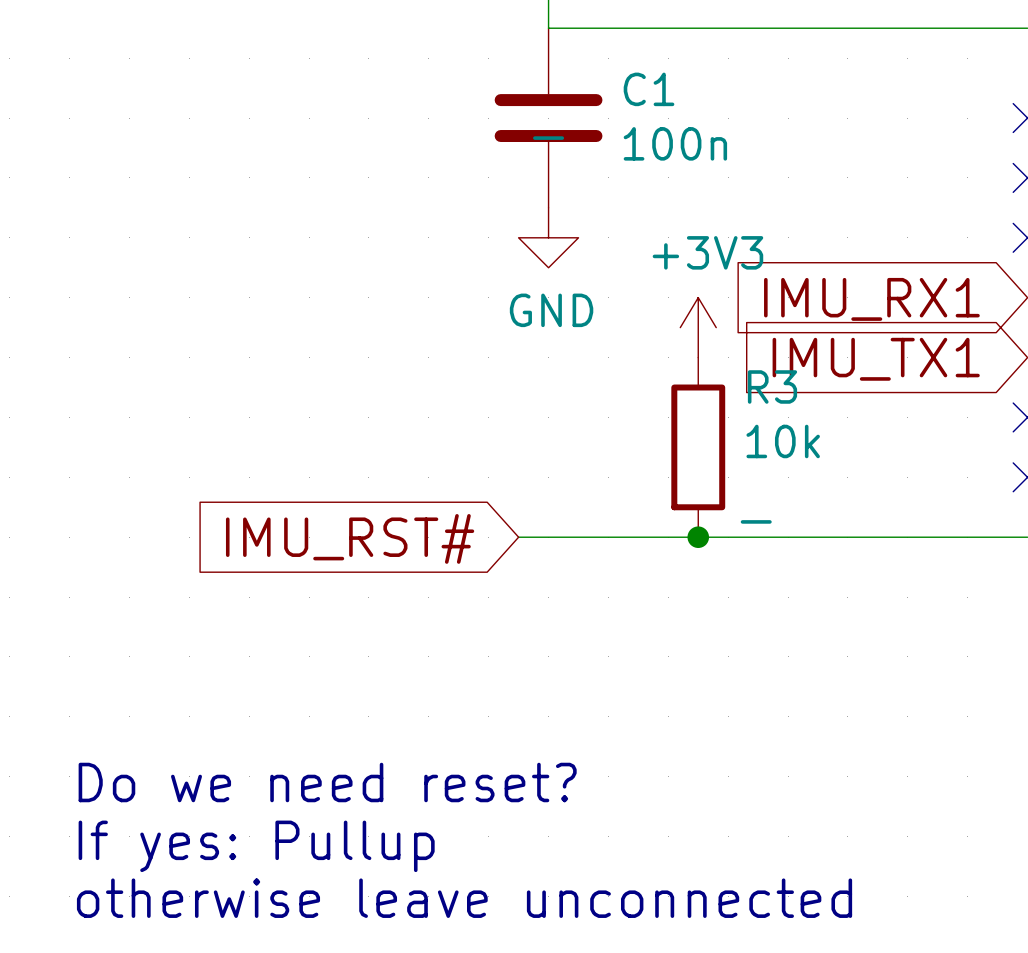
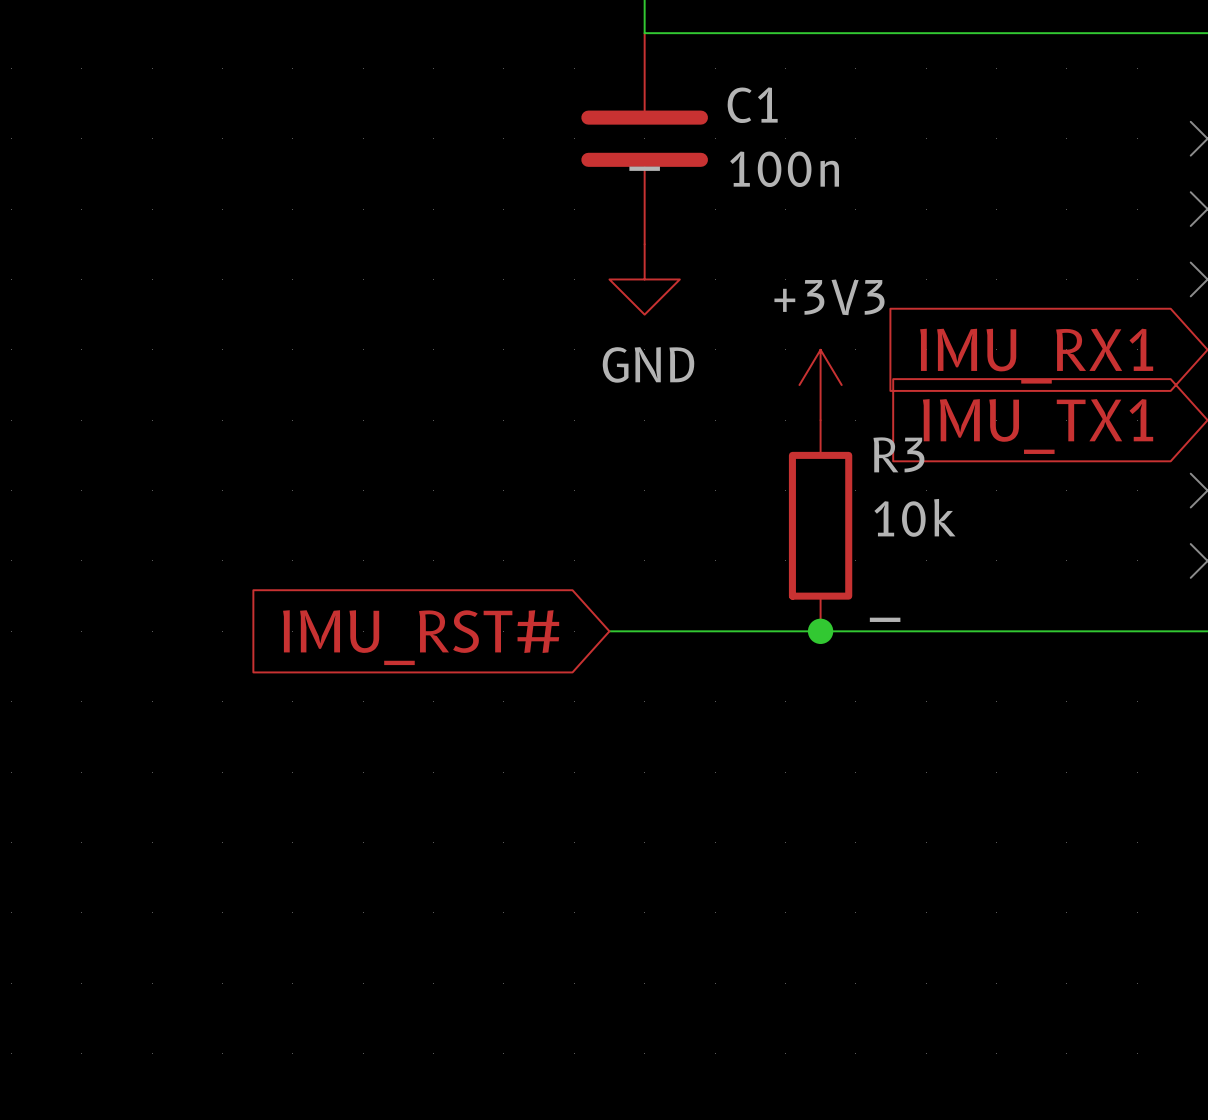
text: Do we need reset? (327, 782) -> none
text: If yes: Pullup (256, 846) -> none
text: otherwise leave unconnected (464, 898) -> none

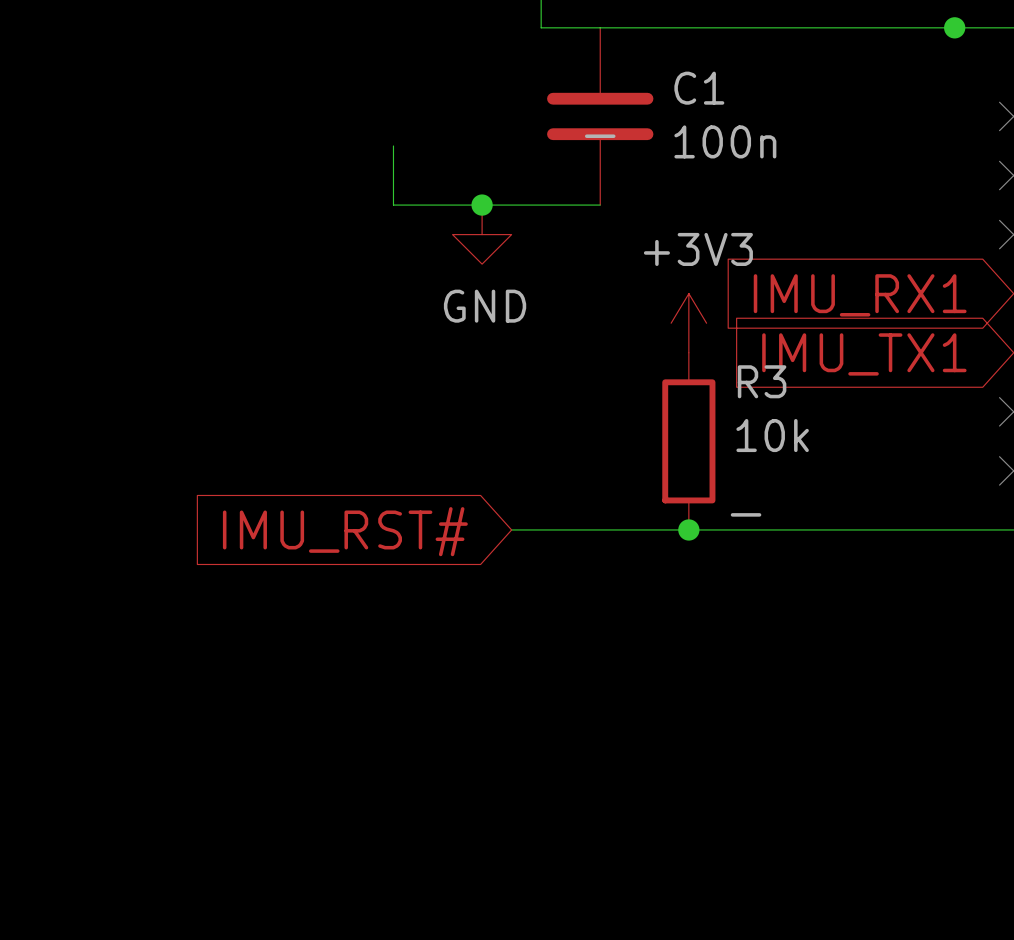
junction: none -> (954, 27)
C1 position: (644, 138) -> (600, 116)
wire: none -> (393, 145) (393, 205) (600, 205)
junction: none -> (482, 205)
power symbol position: GND (644, 279) -> GND (482, 234)

